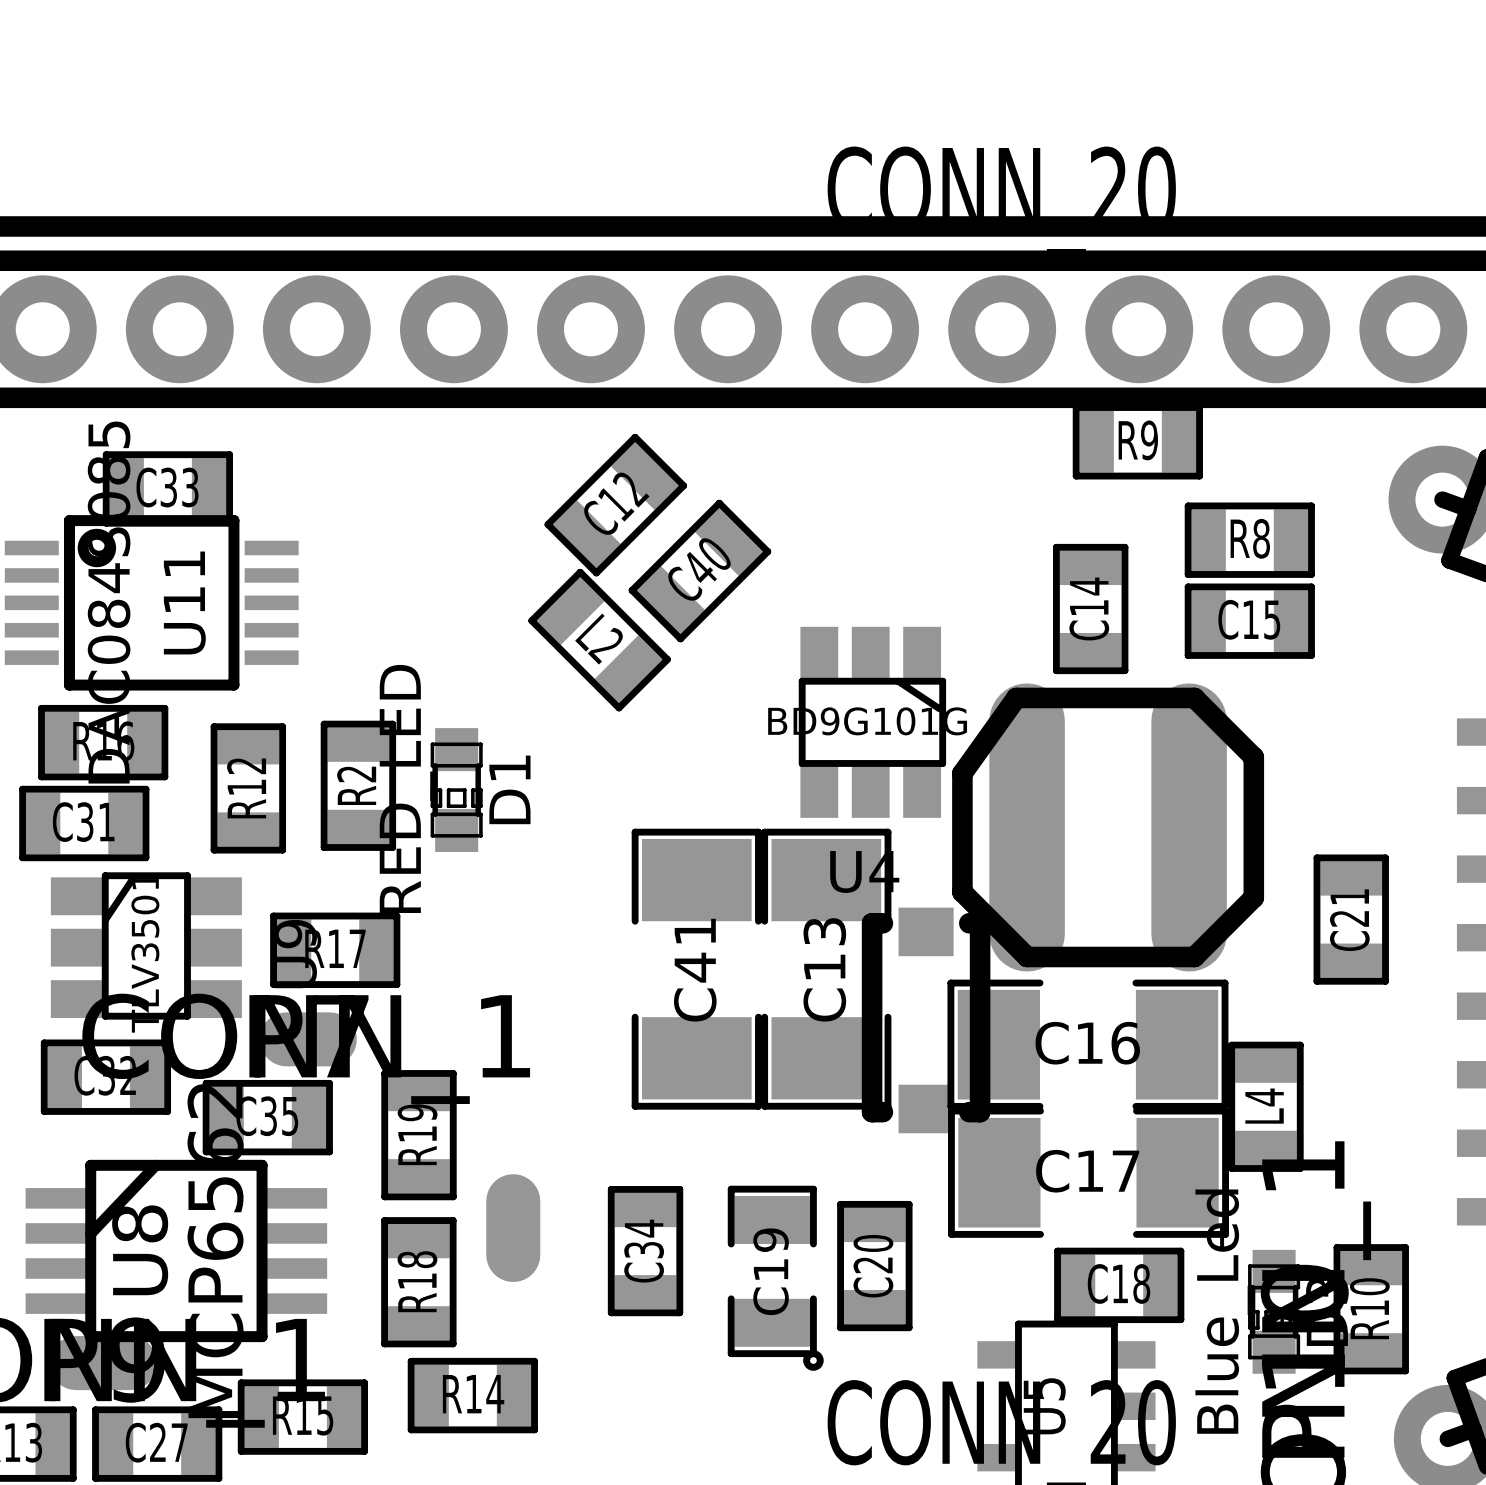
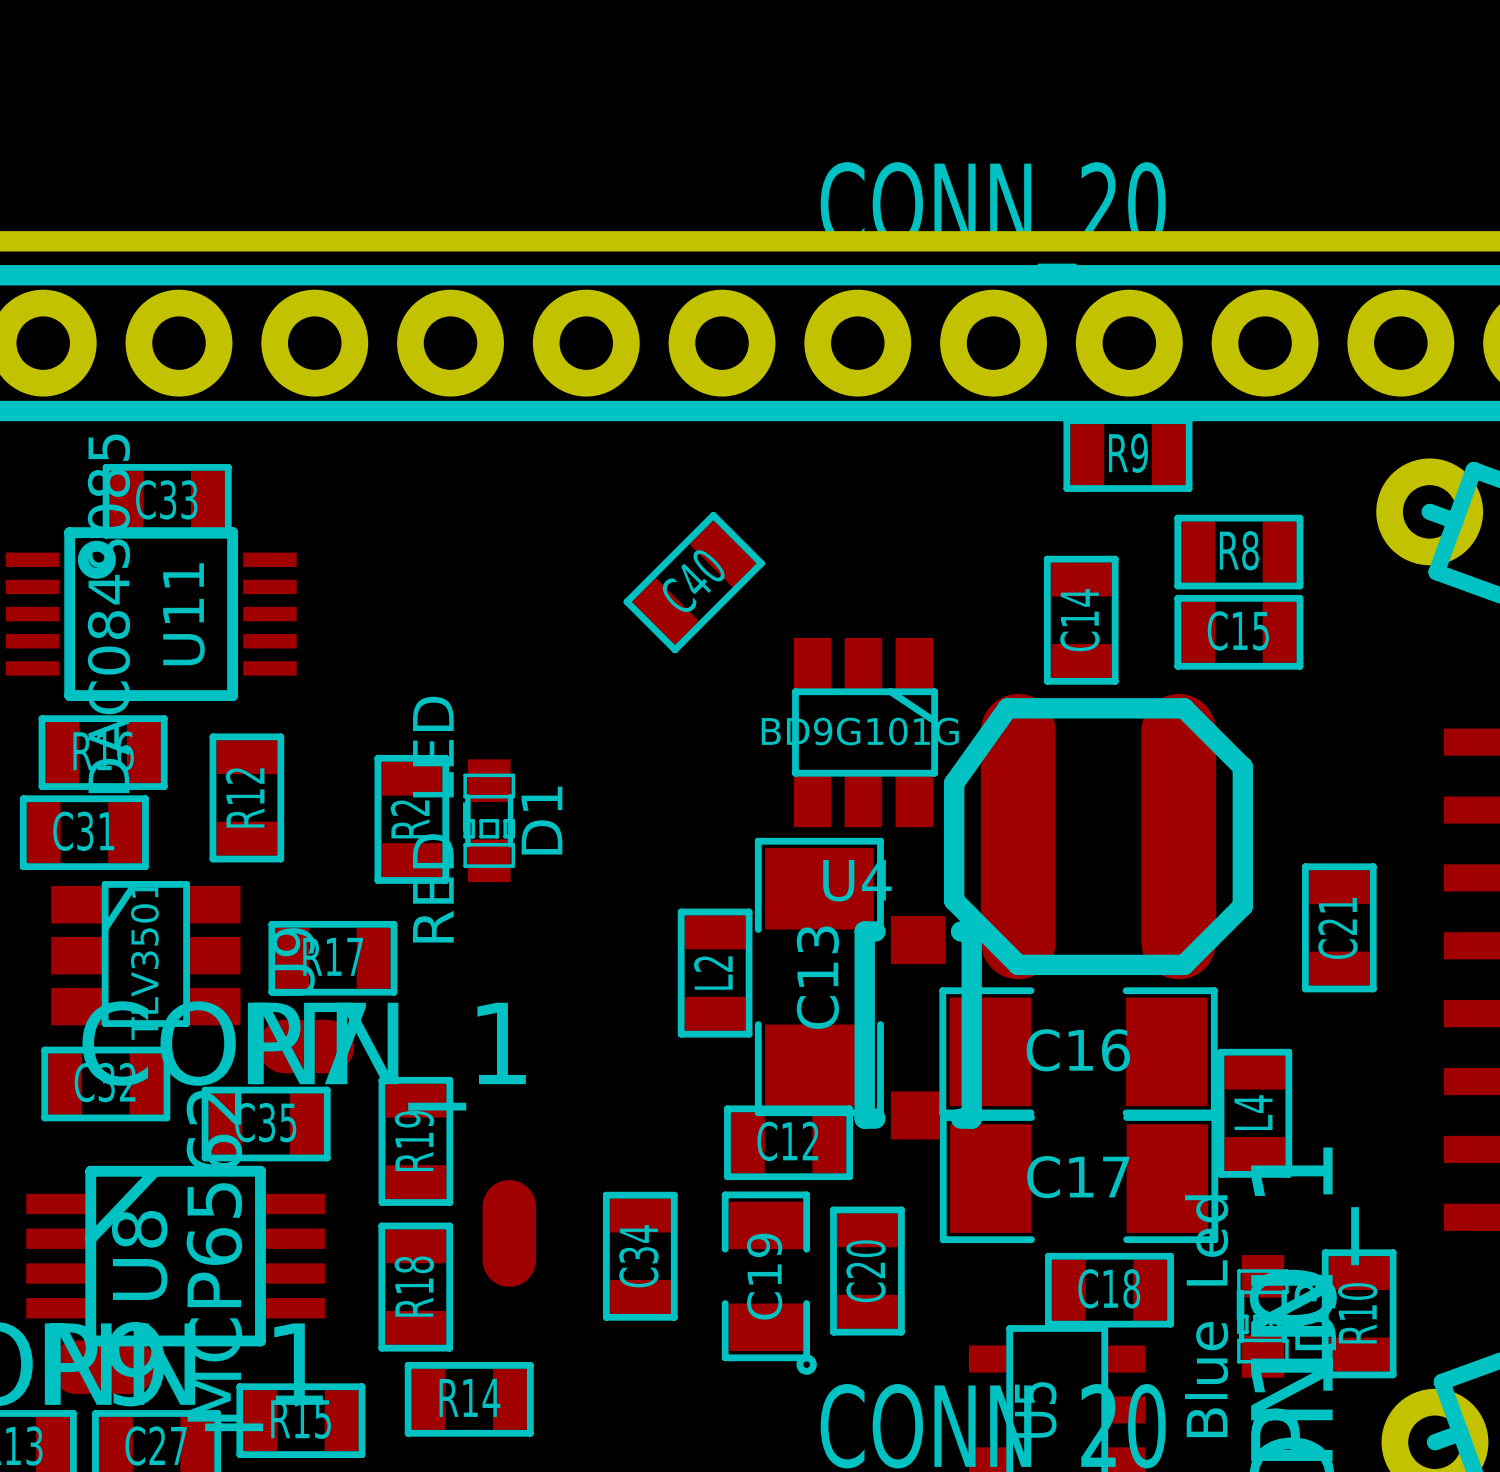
C12 rotation: 0° (615, 505) -> 45° clockwise (788, 1142)
C12 position: (615, 505) -> (788, 1142)
L2 rotation: 0° (599, 640) -> 45° clockwise (715, 973)
L2 position: (599, 640) -> (715, 973)
R2 position: (358, 785) -> (411, 819)
D1 position: (456, 790) -> (489, 820)
C41: (696, 969) -> none

